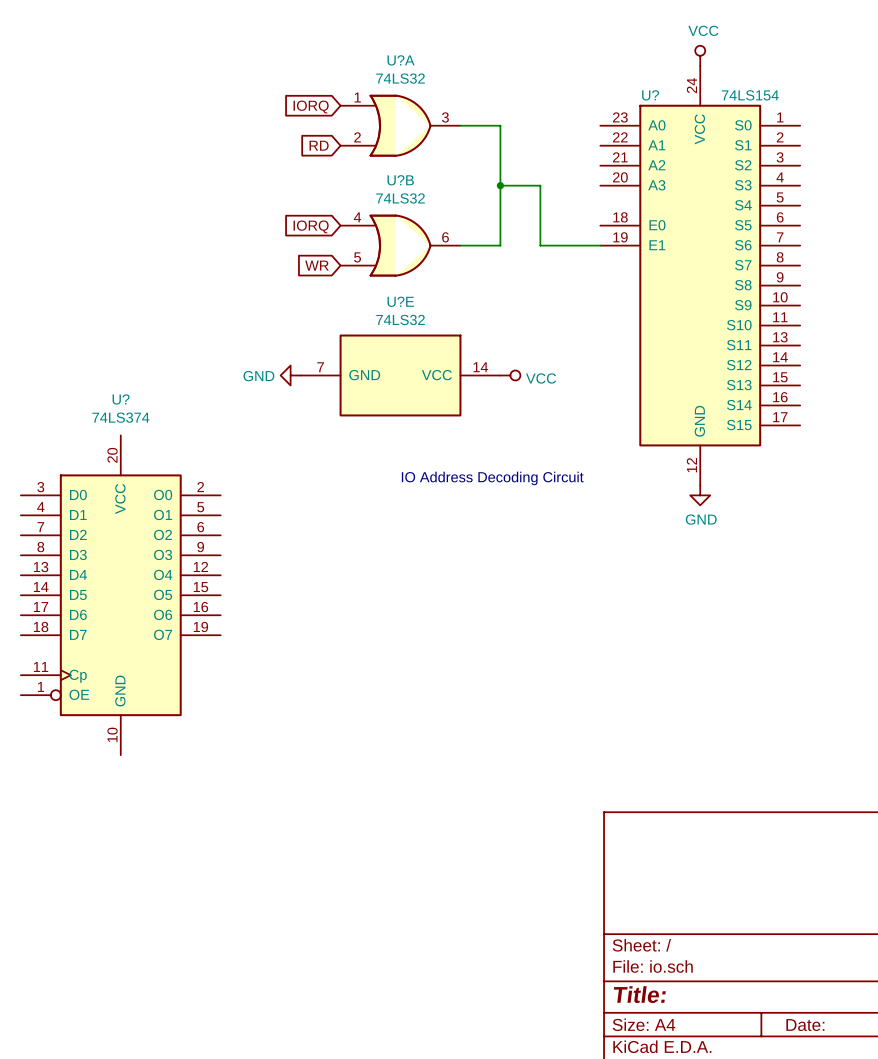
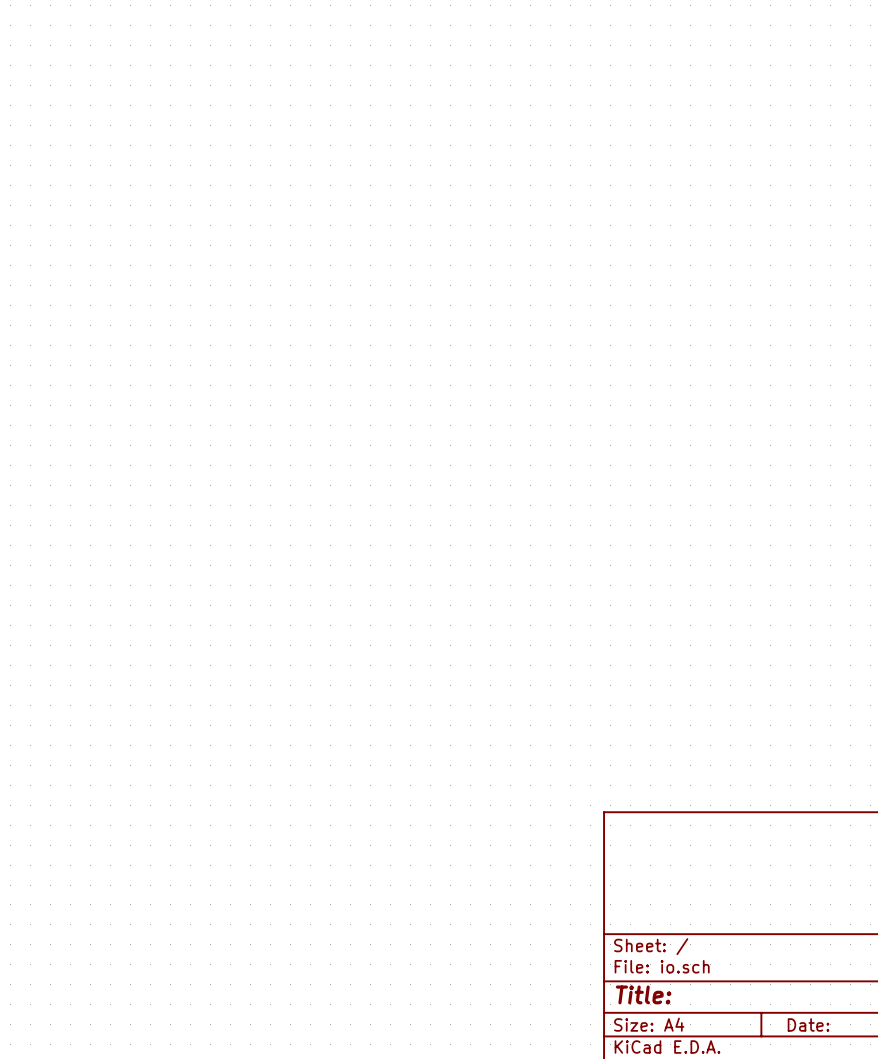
power symbol: VCC (700, 55) -> none
global label: IORQ (311, 107) -> none
U?A: 74LS32 (400, 125) -> none
wire: (460, 125) (500, 125) (500, 245) (460, 245) -> none
global label: RD (319, 145) -> none
wire: (500, 185) (540, 185) (540, 245) (600, 245) -> none
junction: (500, 185) -> none
global label: IORQ (311, 226) -> none
U?B: 74LS32 (400, 245) -> none
global label: WR (316, 265) -> none
U?: 74LS154 (700, 275) -> none
power symbol: GND (290, 375) -> none
U?E: 74LS32 (400, 375) -> none
power symbol: VCC (510, 375) -> none
text: IO Address Decoding Circuit (492, 478) -> none
power symbol: GND (700, 495) -> none
U?: 74LS374 (120, 595) -> none

